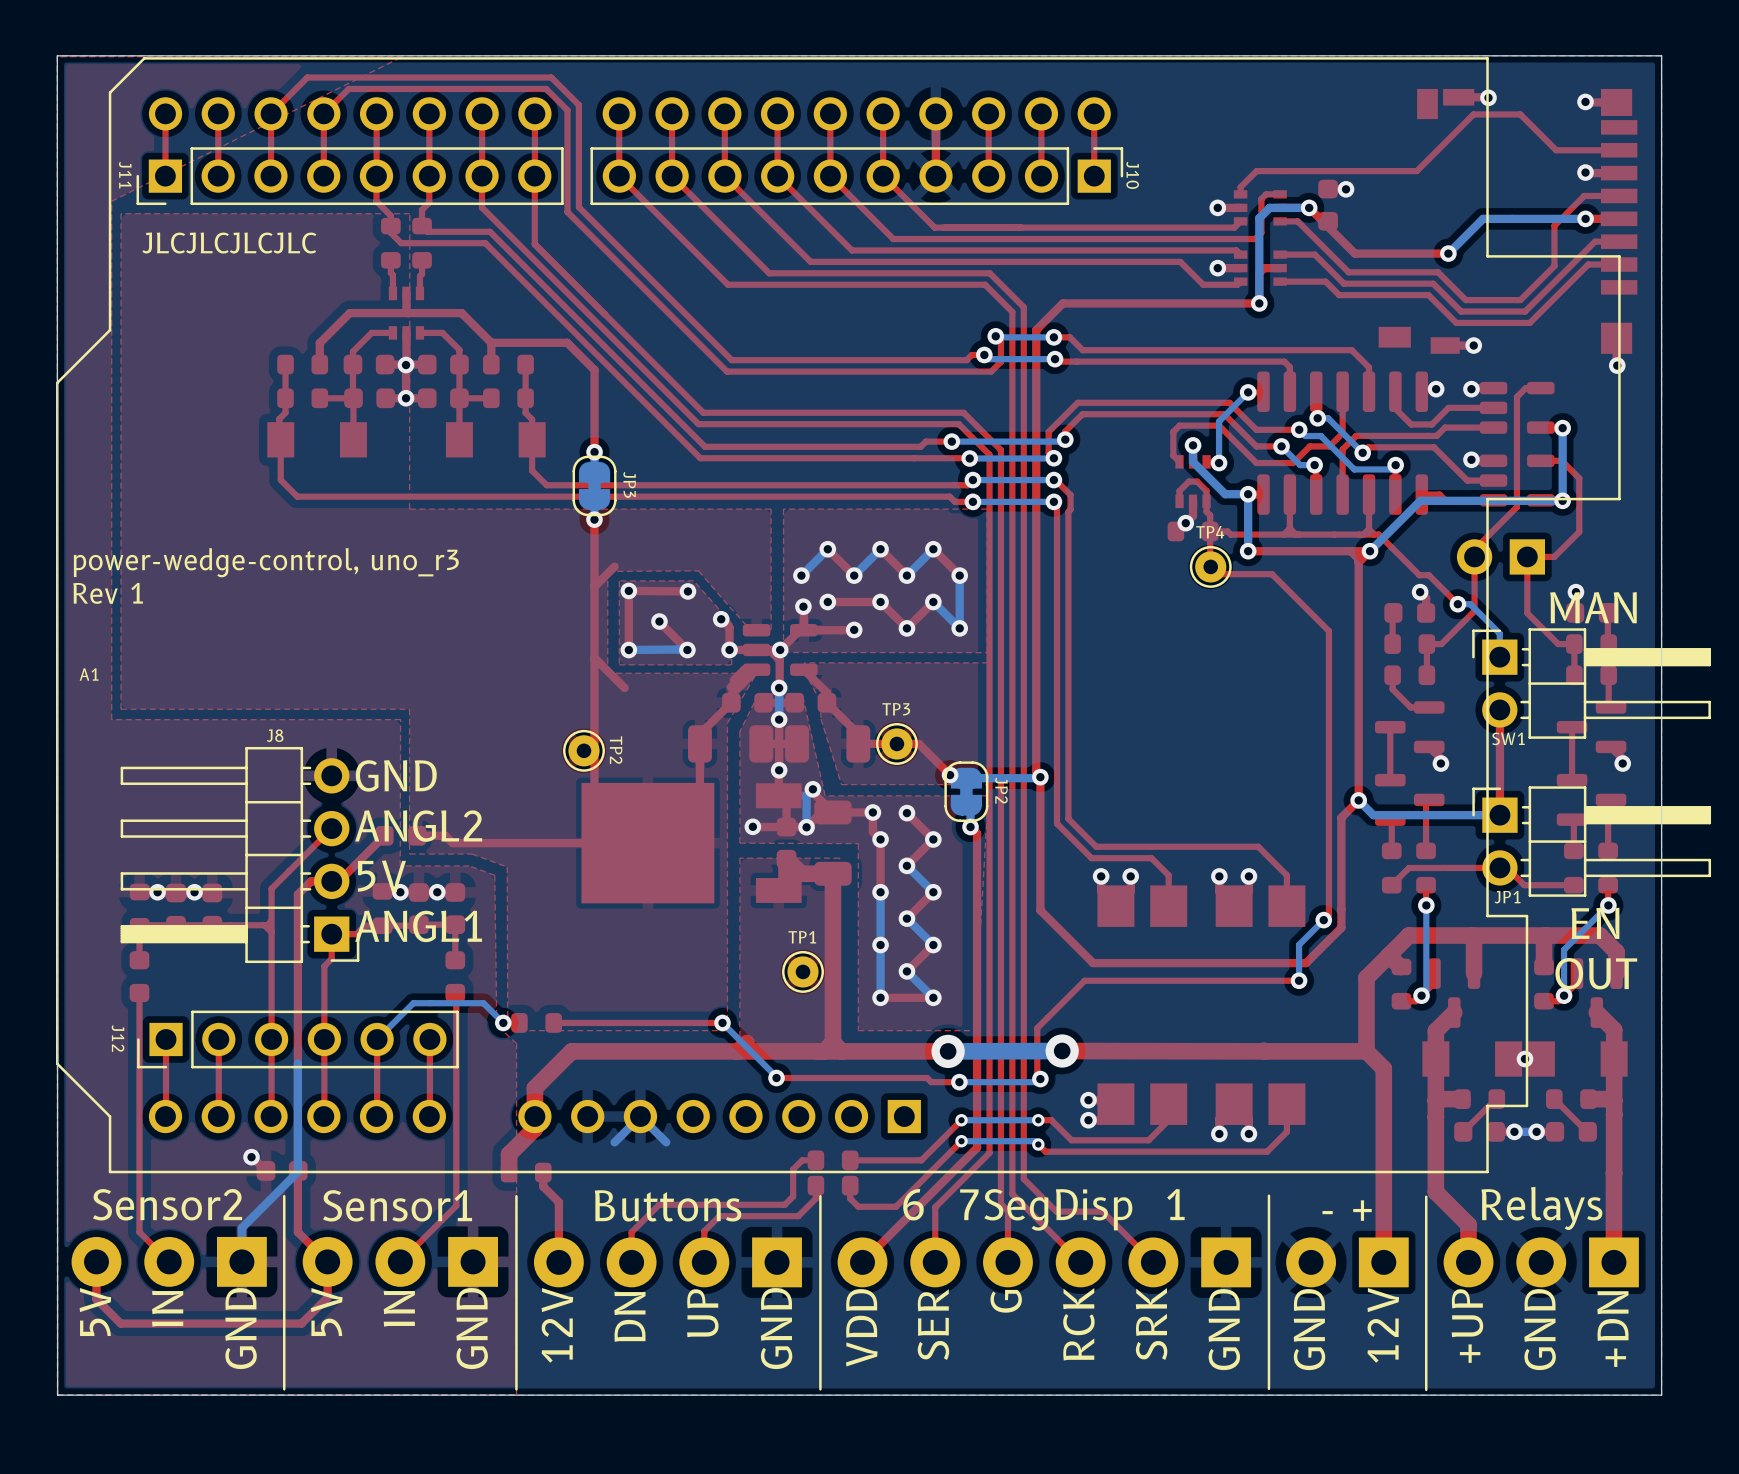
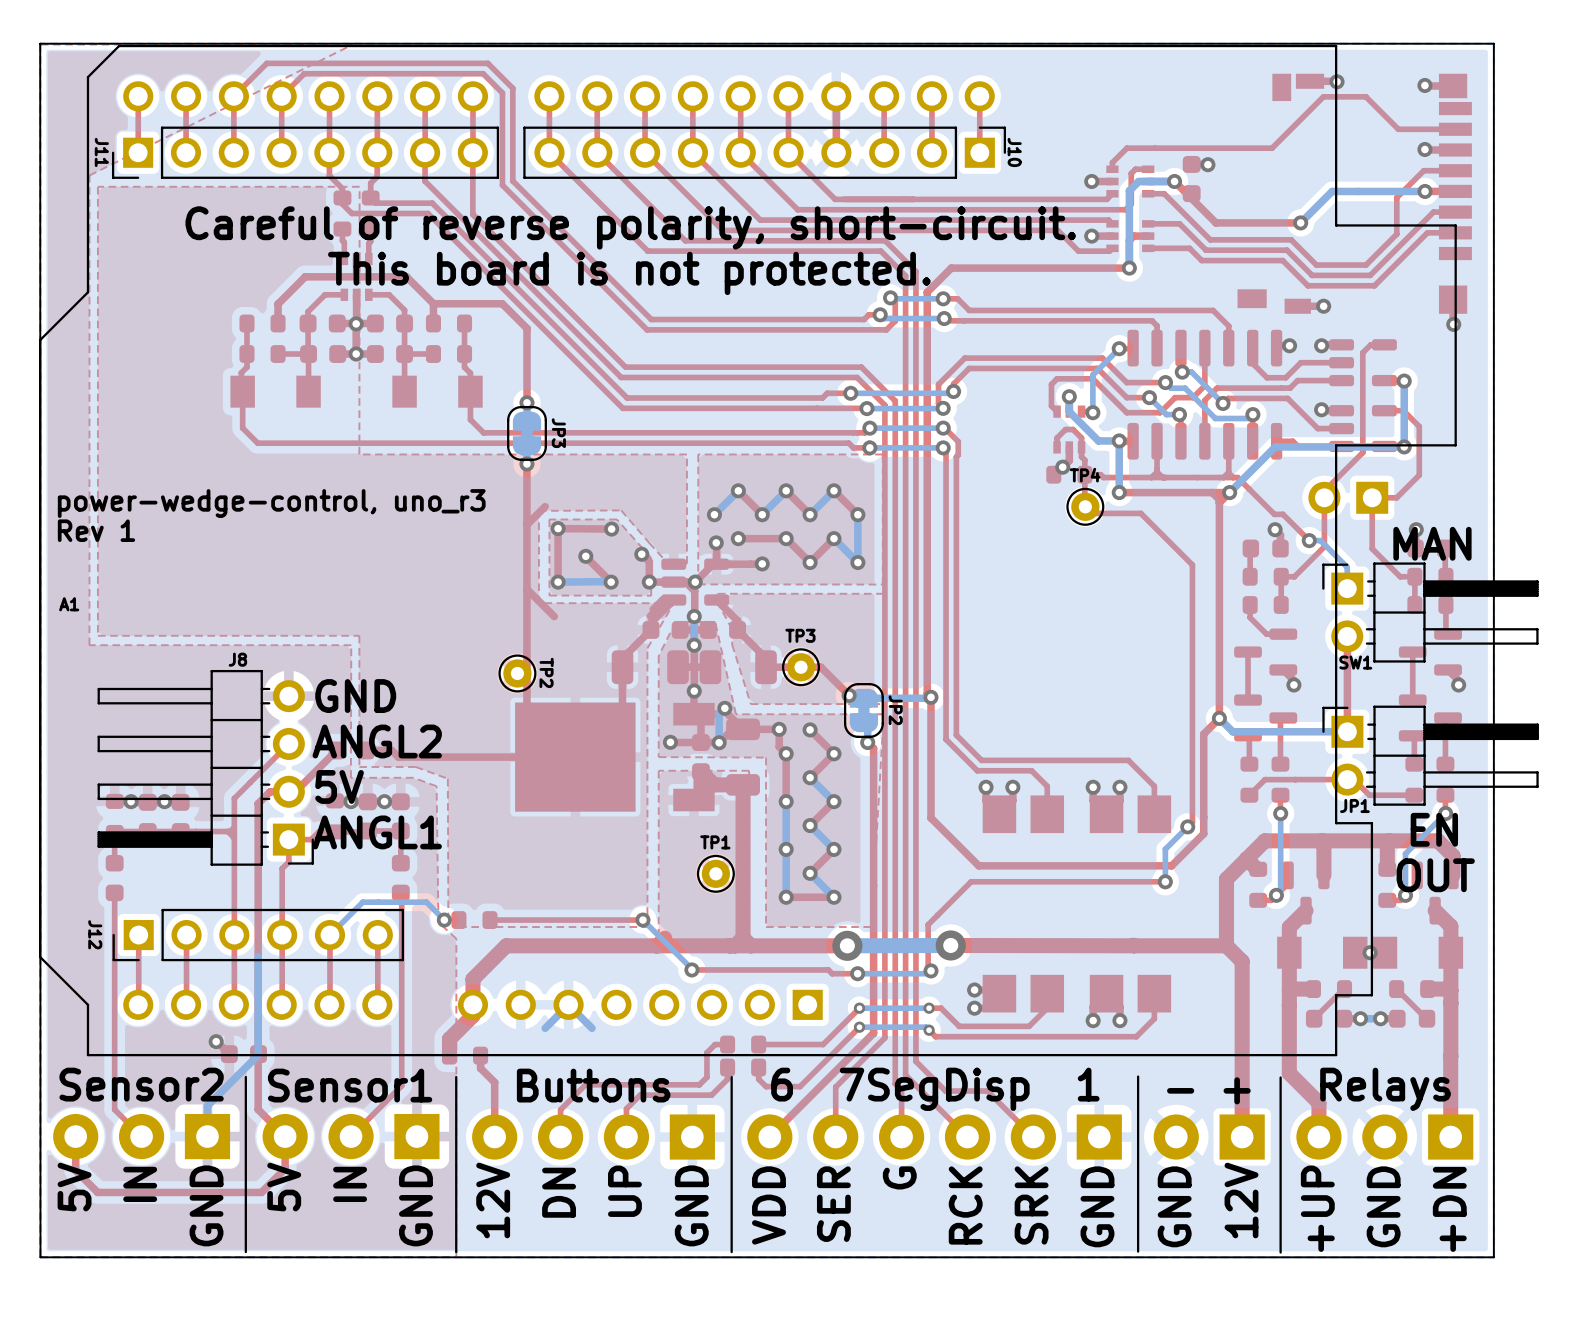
text: JLCJLCJLCJLC (229, 243) -> none
text: none -> Careful of reverse polarity, short-circuit. (630, 227)
text: none -> This board is not protected. (629, 273)

